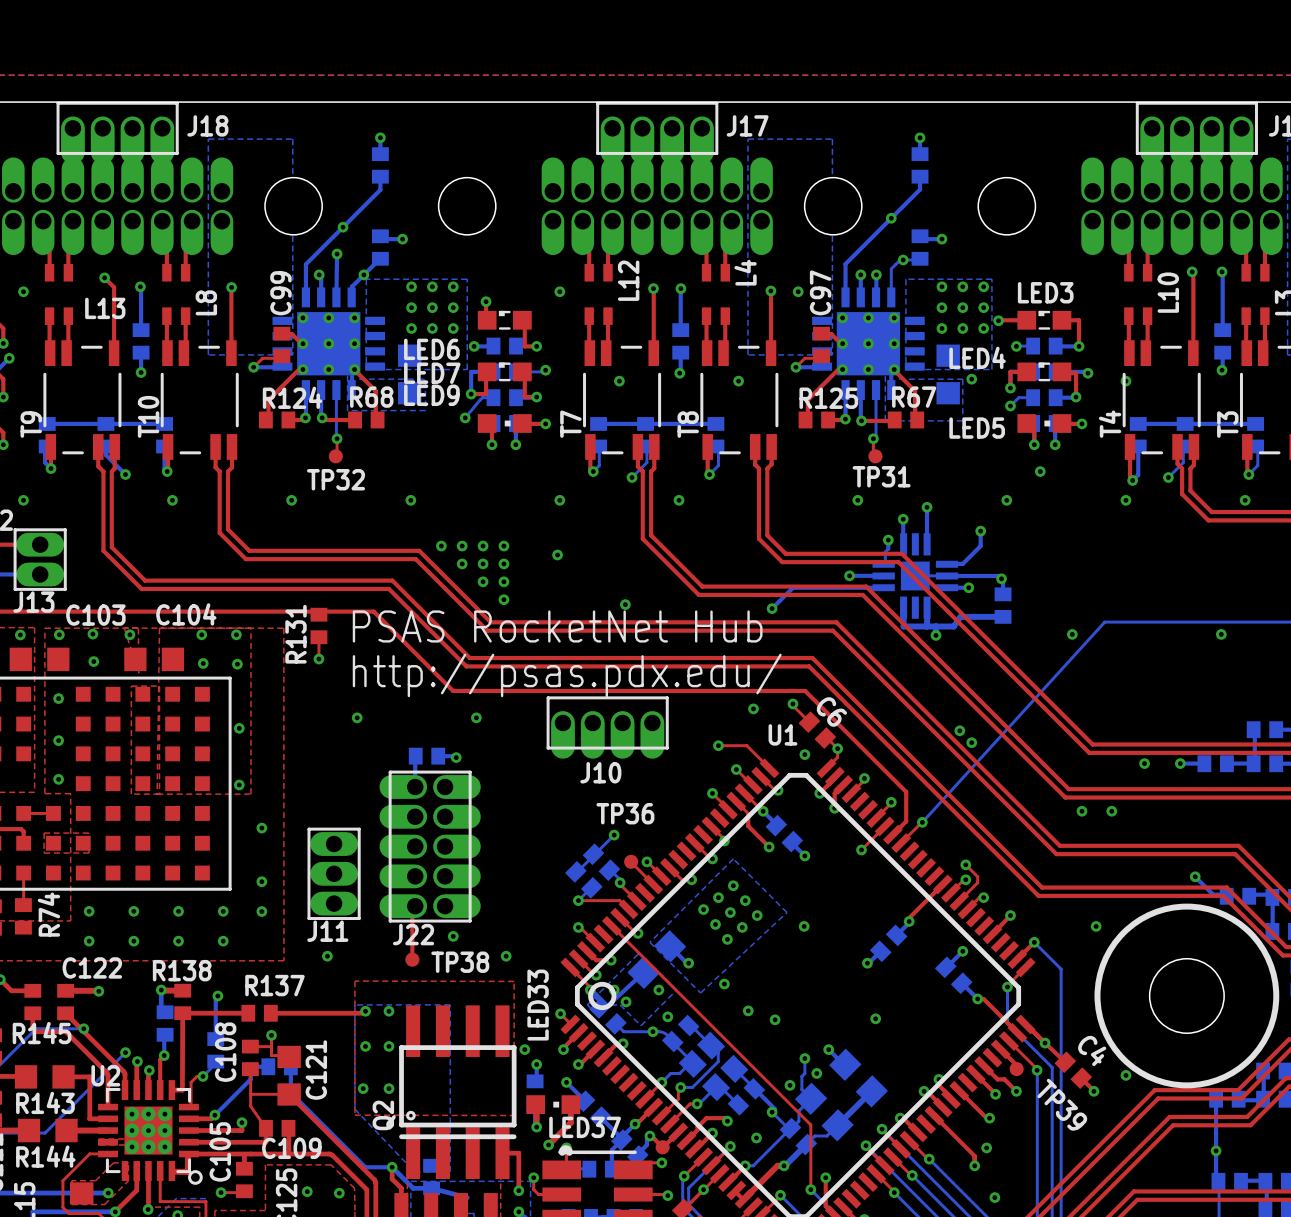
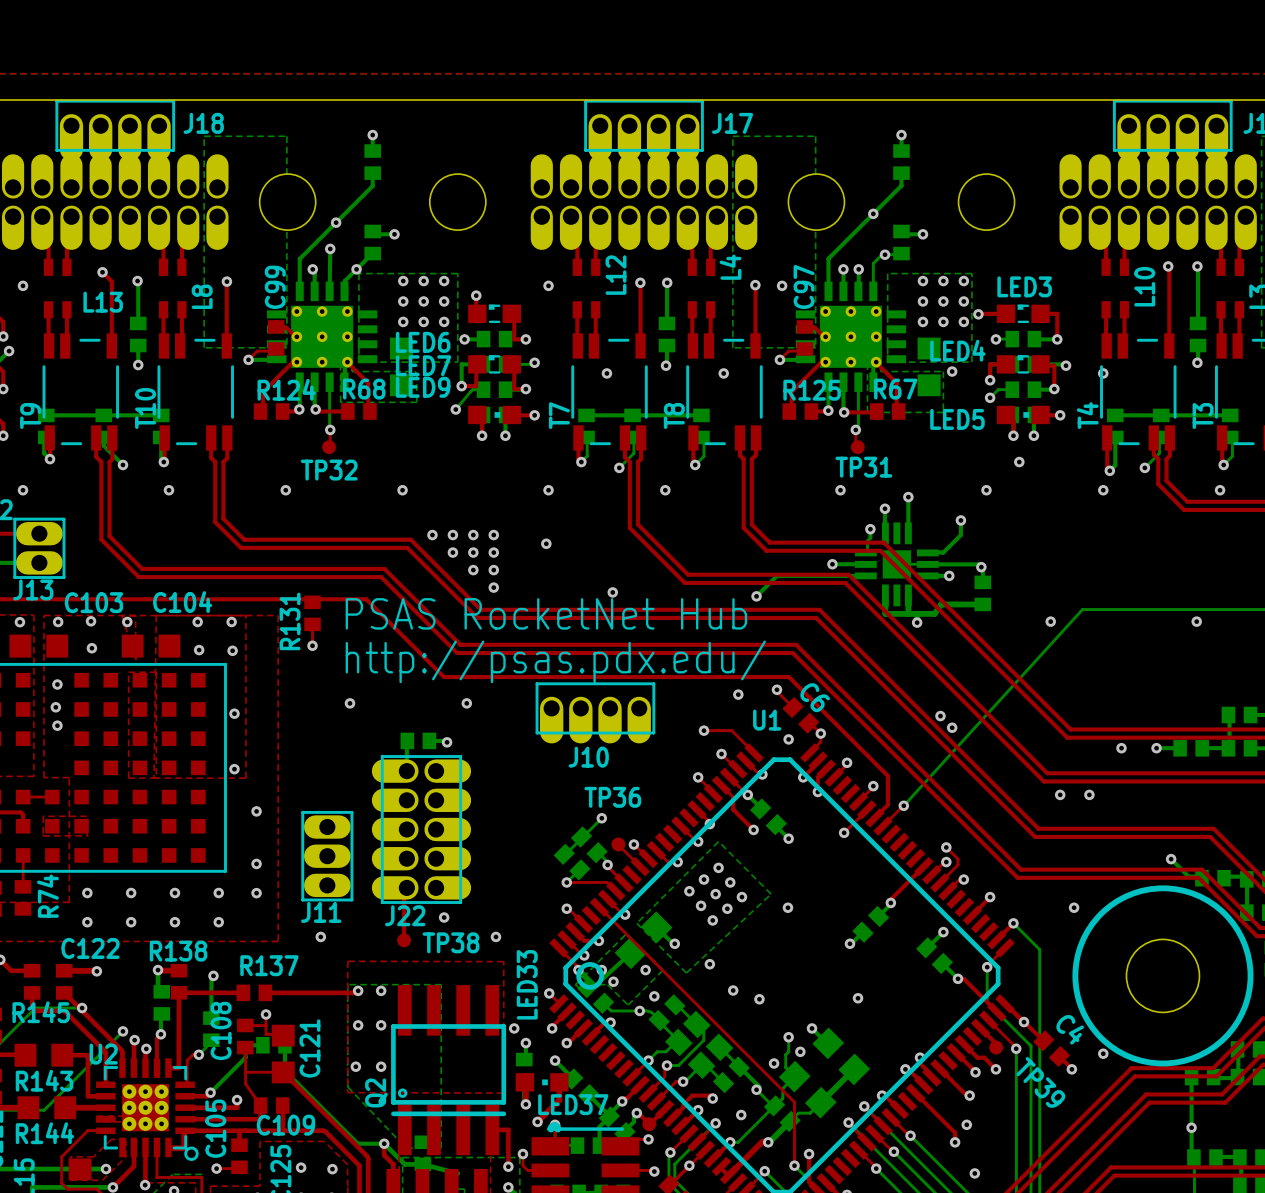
via: none -> (55, 707)
via: (58, 779) -> none

